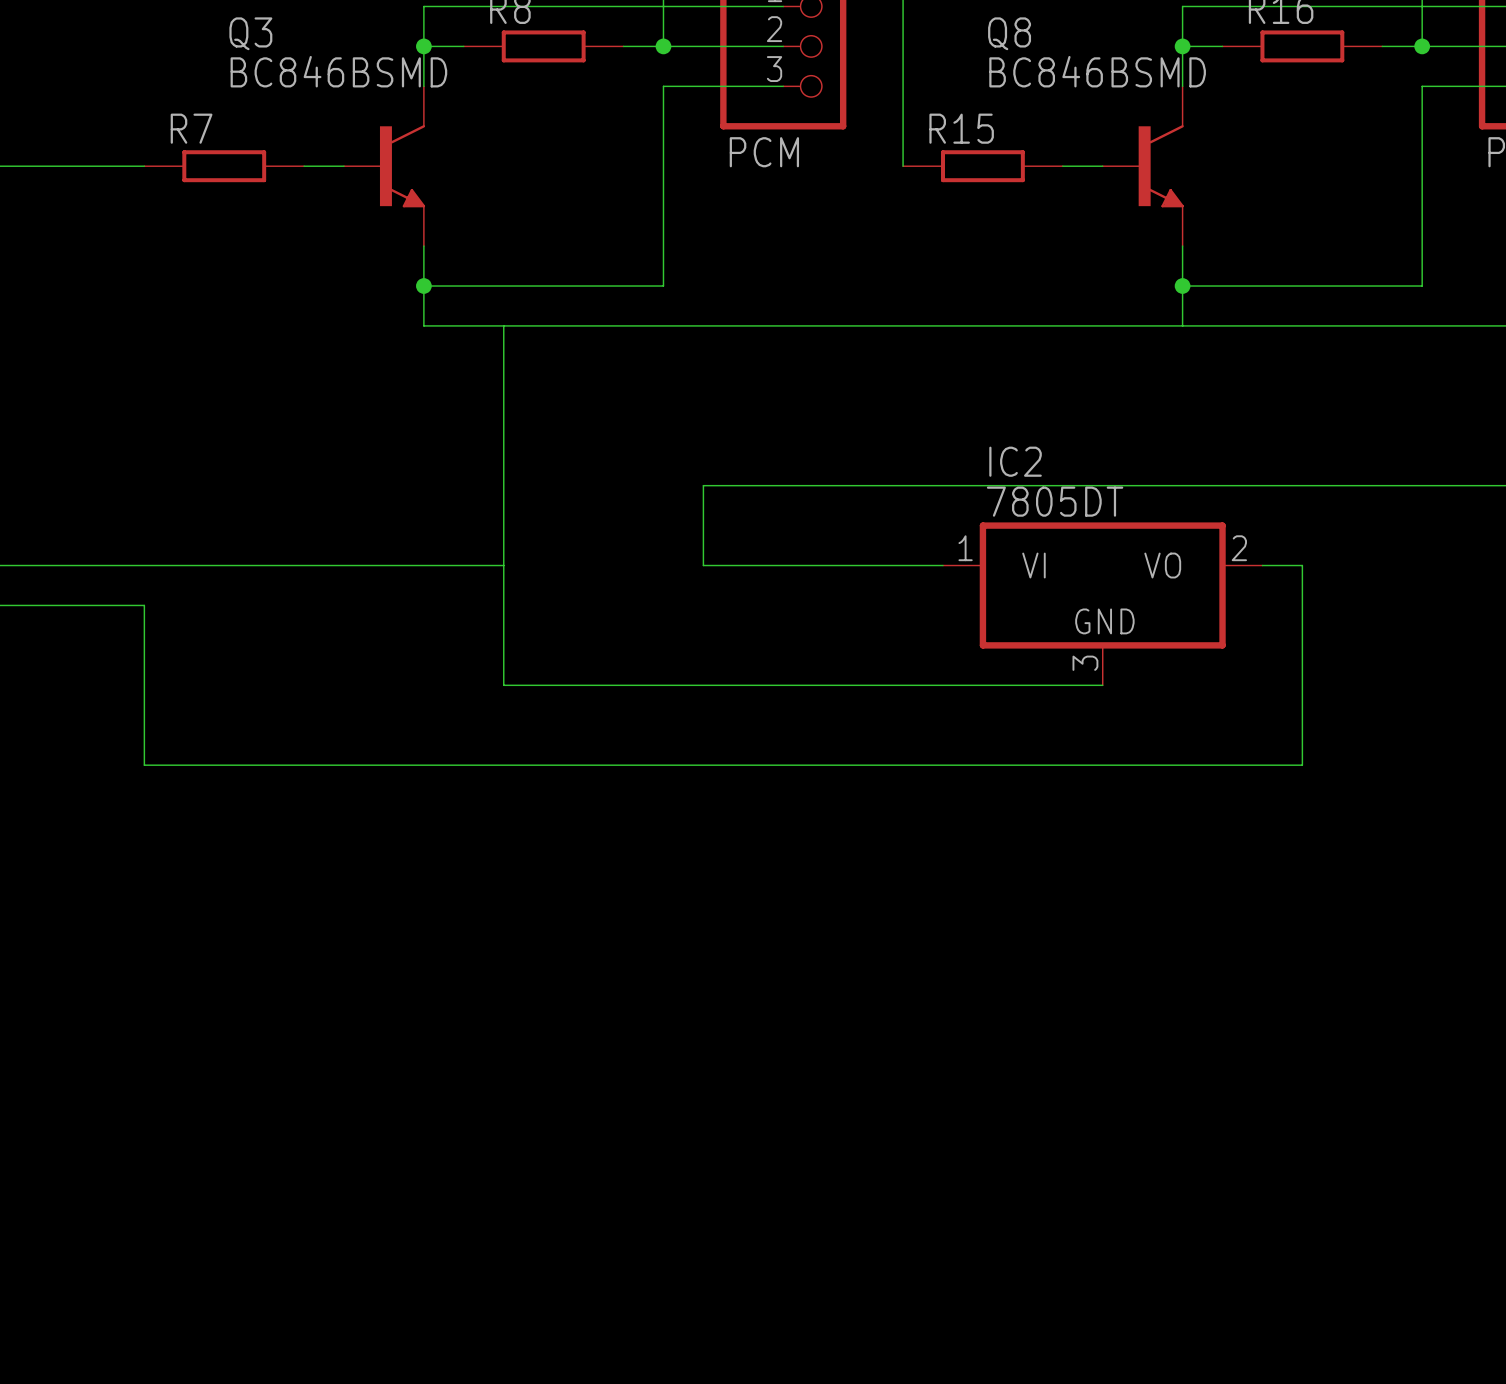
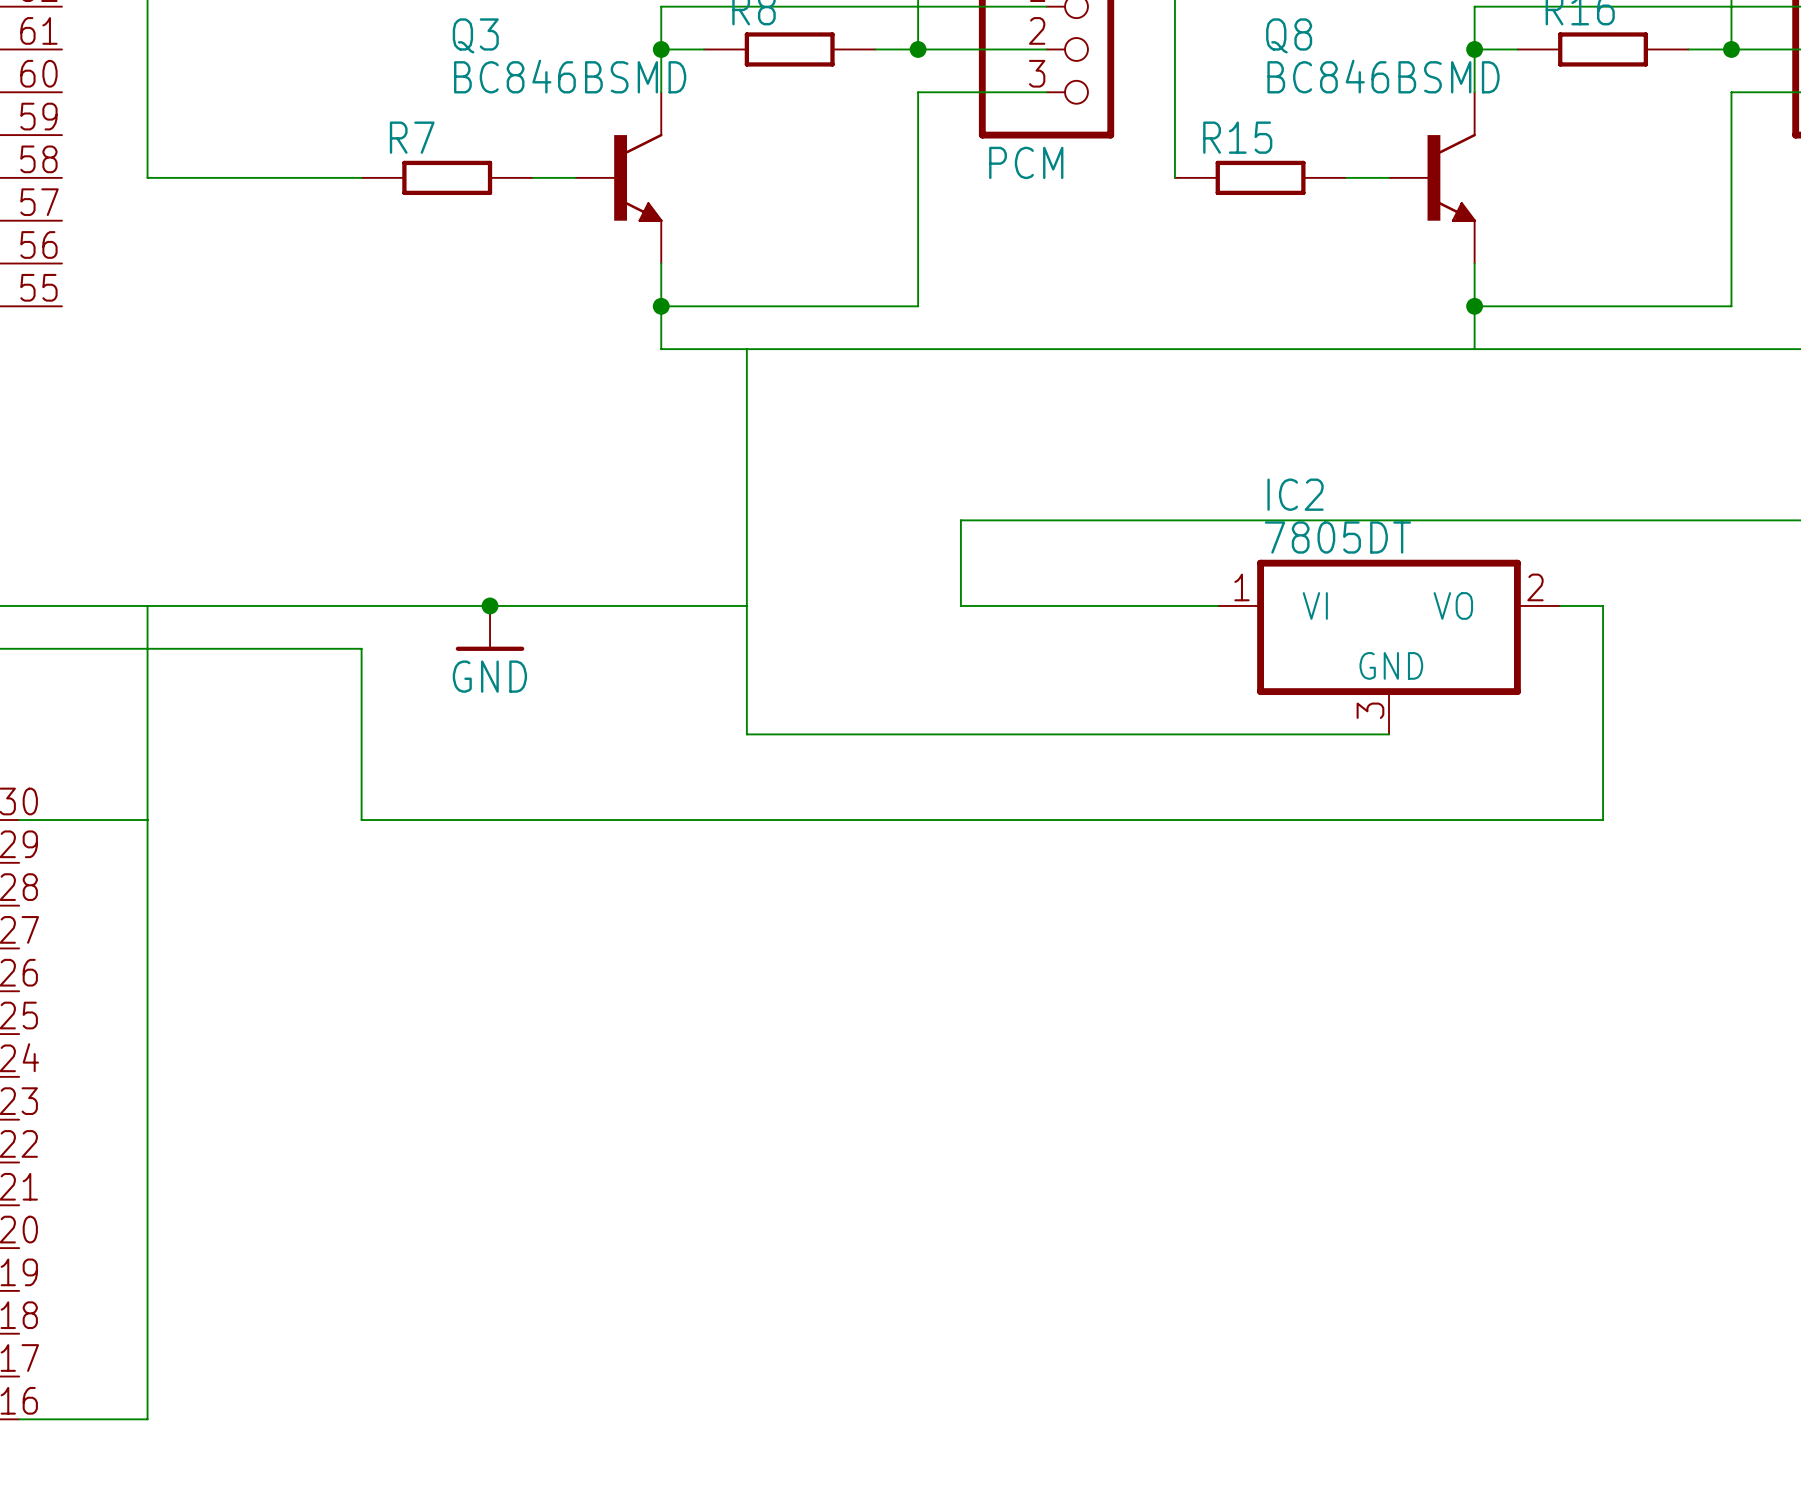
junction: none -> (490, 605)
power symbol: none -> GND (490, 628)

